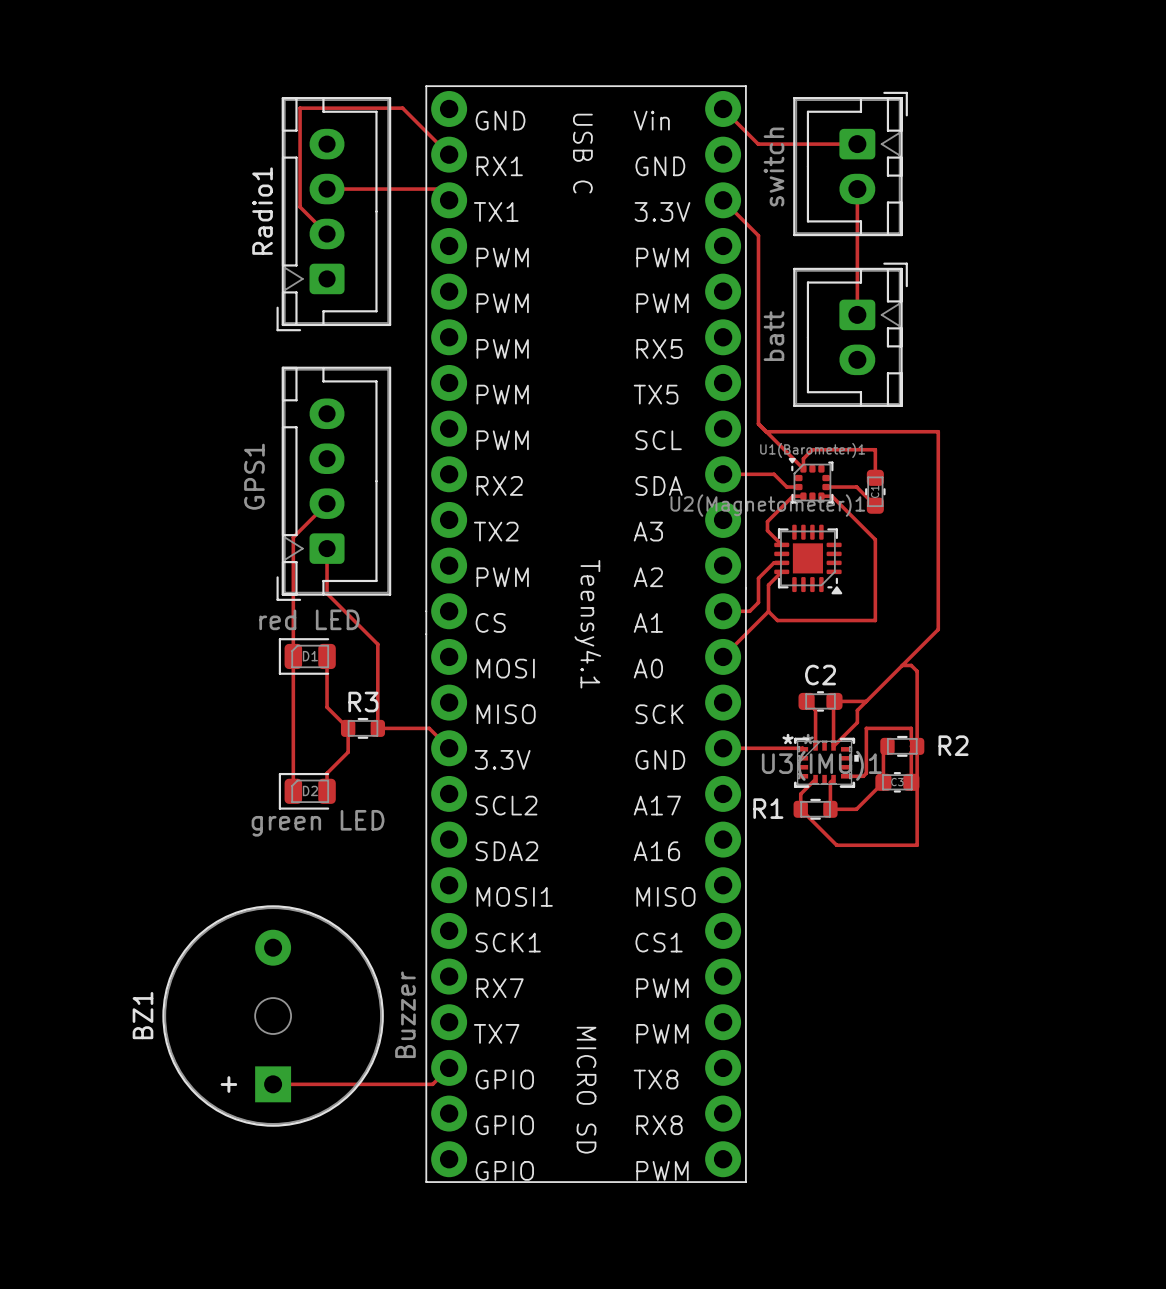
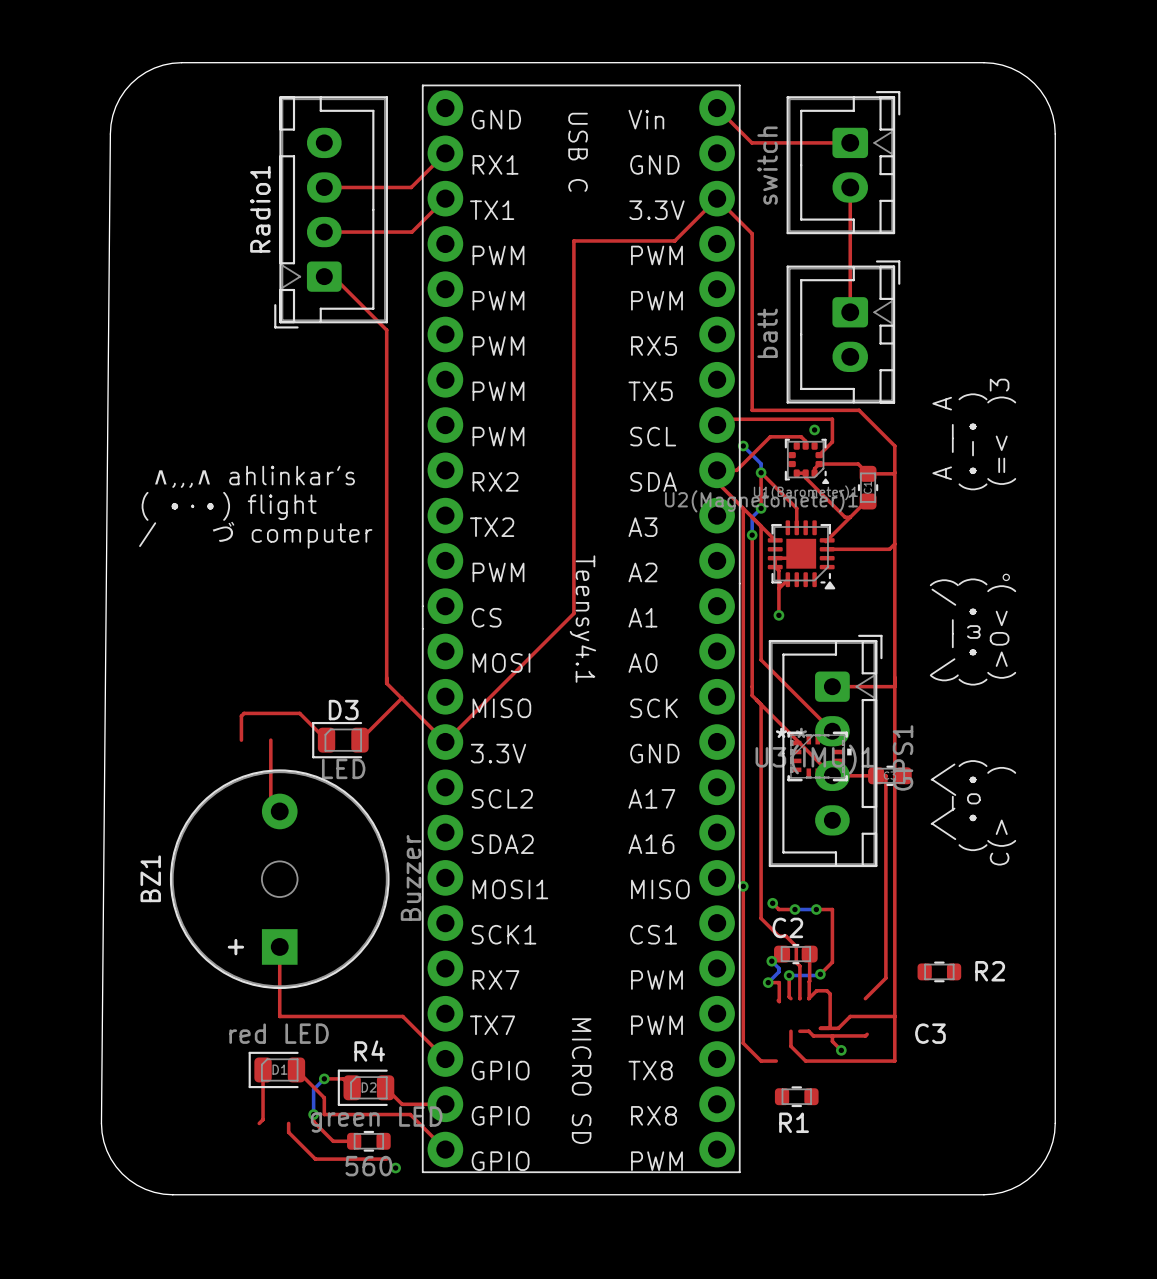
board edge: none -> (181, 62) (983, 62) (1002, 65) (1019, 72) (1040, 90) (1052, 115) (1055, 134) (1055, 1123) (1049, 1150) (1040, 1166) (1027, 1180) (1011, 1189) (983, 1194) (172, 1194) (154, 1192) (137, 1185) (116, 1166) (103, 1141) (101, 1123) (110, 134) (115, 106) (131, 83) (154, 68) (181, 62)
top track: (449, 154) (402, 108) (300, 108) (300, 207) (327, 234) -> (445, 198) (411, 232) (324, 232)
top track: (414, 189) (437, 189) -> (411, 187) (445, 153)
top track: none -> (717, 198) (674, 240) (573, 240) (573, 613) (445, 742)
top track: (758, 413) (758, 423) (803, 468) (803, 458) (812, 449) (875, 449) (875, 477) -> (752, 410) (859, 410) (894, 445) (894, 1061) (805, 1061) (790, 1046) (790, 1031)
top track: (766, 431) (938, 431) (938, 629) (857, 710) (857, 722) (833, 746) (834, 701) -> none
top track: none -> (717, 428) (717, 425) (722, 419) (832, 419) (832, 441) (819, 455)
via: none -> (814, 429)
bottom track: none -> (743, 445) (761, 463) (761, 472)
via: none -> (743, 445)
top track: none -> (717, 470) (717, 482) (761, 526) (761, 659) (832, 731)
top track: (742, 474) (774, 474) (786, 487) (798, 487) -> (736, 470) (770, 436) (801, 436) (805, 441) (805, 445)
via: none -> (761, 472)
top track: none -> (894, 472) (868, 473) (858, 464) (819, 464) (814, 468) (814, 473)
top track: none -> (796, 473) (805, 473) (805, 477) (845, 517) (850, 517)
text: none -> ∧,,,∧ ahlinkar's (254, 476)
U1(Barometer)1 rotation: 0° (811, 480) -> 180° (807, 461)
GPS1 rotation: 0° (333, 483) -> 180° (825, 750)
GPS1 position: (333, 483) -> (825, 750)
top track: (826, 487) (856, 487) (875, 505) -> (825, 541) (868, 501)
top track: (803, 496) (792, 496) (767, 521) (767, 530) -> none
top track: (821, 496) (831, 496) (875, 539) (875, 620) (777, 620) (768, 611) -> none
top track: (327, 503) (293, 537) (293, 791) -> none
text: none -> ( •·•) flight (229, 506)
top track: none -> (743, 508) (743, 1043) (761, 1061) (776, 1061)
top track: none -> (761, 508) (761, 472) (796, 508) (796, 526)
bottom track: none -> (761, 508) (752, 517) (752, 535)
via: none -> (761, 508)
text: none -> / づ computer (255, 534)
via: none -> (752, 535)
top track: none -> (813, 541) (796, 558) (775, 558) (775, 567) (778, 570) (778, 615)
top track: (327, 548) (327, 593) (377, 644) (377, 728) (429, 728) -> (324, 276) (333, 276) (386, 330) (386, 683) (425, 722)
top track: none -> (894, 544) (889, 549) (827, 549)
top track: (781, 562) (773, 562) (758, 578) -> (752, 535) (752, 573)
top track: (781, 571) (768, 585) (768, 611) -> none
top track: none -> (787, 579) (778, 588)
top track: (758, 602) (749, 611) (723, 611) -> (752, 597) (752, 695) (832, 775) (885, 775) (885, 978) (865, 998)
top track: (768, 611) (723, 656) -> none
via: none -> (778, 615)
text: none -> /\_/\ (\ __ /) A __ A (944, 618)
text: none -> ( •o•) ( •ω• ) (•-• ) (973, 622)
text: none -> C(> ) (>O< )｡ (=< )3 (1001, 622)
D1 position: (307, 656) -> (276, 1069)
top track: (327, 656) (327, 707) (348, 728) (348, 752) (327, 773) (327, 791) -> none
top track: (902, 665) (911, 665) (917, 671) (917, 845) (836, 845) (800, 809) (800, 794) (815, 779) -> none
C2 name position: C2 (820, 675) -> C2 (787, 927)
top track: none -> (832, 686) (894, 686)
top track: (806, 701) (815, 710) (815, 746) -> none
C2 position: (820, 701) -> (795, 954)
top track: (830, 701) (866, 701) -> none
top track: none -> (401, 698) (359, 740)
top track: none -> (761, 704) (761, 918) (778, 936) (786, 936) (796, 946) (796, 962) (799, 966) (799, 998)
R3: (362, 728) -> none
top track: none -> (241, 740) (241, 716) (244, 713) (299, 713) (326, 740)
top track: none -> (270, 740) (270, 802) (279, 811)
D3: none -> LED (340, 740)
top track: (887, 746) (883, 750) (883, 782) (856, 809) (830, 809) (830, 782) (833, 779) -> none
R2 position: (902, 746) -> (939, 971)
top track: (723, 748) (803, 749) -> none
top track: (845, 776) (863, 776) (866, 773) (866, 728) (911, 728) (911, 740) (917, 746) (911, 752) (911, 782) -> none
D2 position: (307, 791) -> (366, 1087)
R1 name position: R1 (768, 808) -> R1 (794, 1122)
R1 position: (815, 809) -> (796, 1096)
via: none -> (743, 886)
top track: none -> (772, 903) (778, 909) (794, 909)
via: none -> (772, 903)
bottom track: none -> (794, 909) (816, 909)
via: none -> (794, 909)
top track: none -> (814, 909) (832, 909) (832, 962) (820, 974)
via: none -> (816, 909)
top track: none -> (805, 954) (809, 954) (809, 998)
bottom track: none -> (771, 961) (778, 968) (778, 971) (768, 982)
via: none -> (771, 961)
bottom track: none -> (820, 974) (789, 975)
via: none -> (820, 974)
top track: none -> (789, 975) (789, 996) (790, 998)
via: none -> (789, 975)
top track: none -> (768, 982) (779, 982) (778, 1000)
via: none -> (768, 982)
top track: none -> (808, 998) (816, 990) (826, 990) (830, 993) (828, 1028)
BZ1 position: (273, 1016) -> (279, 879)
top track: none -> (894, 1016) (850, 1016) (838, 1028) (820, 1028)
top track: none -> (799, 1031) (808, 1031) (813, 1035) (865, 1035) (867, 1034)
text: none -> C3 (930, 1033)
top track: none -> (832, 1035) (832, 1041) (841, 1050)
via: none -> (841, 1050)
top track: (449, 1067) (432, 1084) (273, 1084) -> (445, 1059) (402, 1016) (279, 1016) (279, 946)
top track: none -> (263, 1069) (263, 1119) (259, 1123)
top track: none -> (296, 1069) (324, 1097) (324, 1114) (410, 1114) (445, 1149)
top track: none -> (324, 1078) (343, 1078) (352, 1087)
bottom track: none -> (324, 1078) (313, 1089) (313, 1114)
via: none -> (324, 1078)
top track: none -> (385, 1087) (402, 1104) (445, 1104)
top track: none -> (313, 1114) (313, 1121) (333, 1141) (354, 1141)
via: none -> (313, 1114)
top track: none -> (288, 1123) (288, 1132) (315, 1159) (386, 1159)
R4: none -> 560 (368, 1141)
via: none -> (395, 1168)

